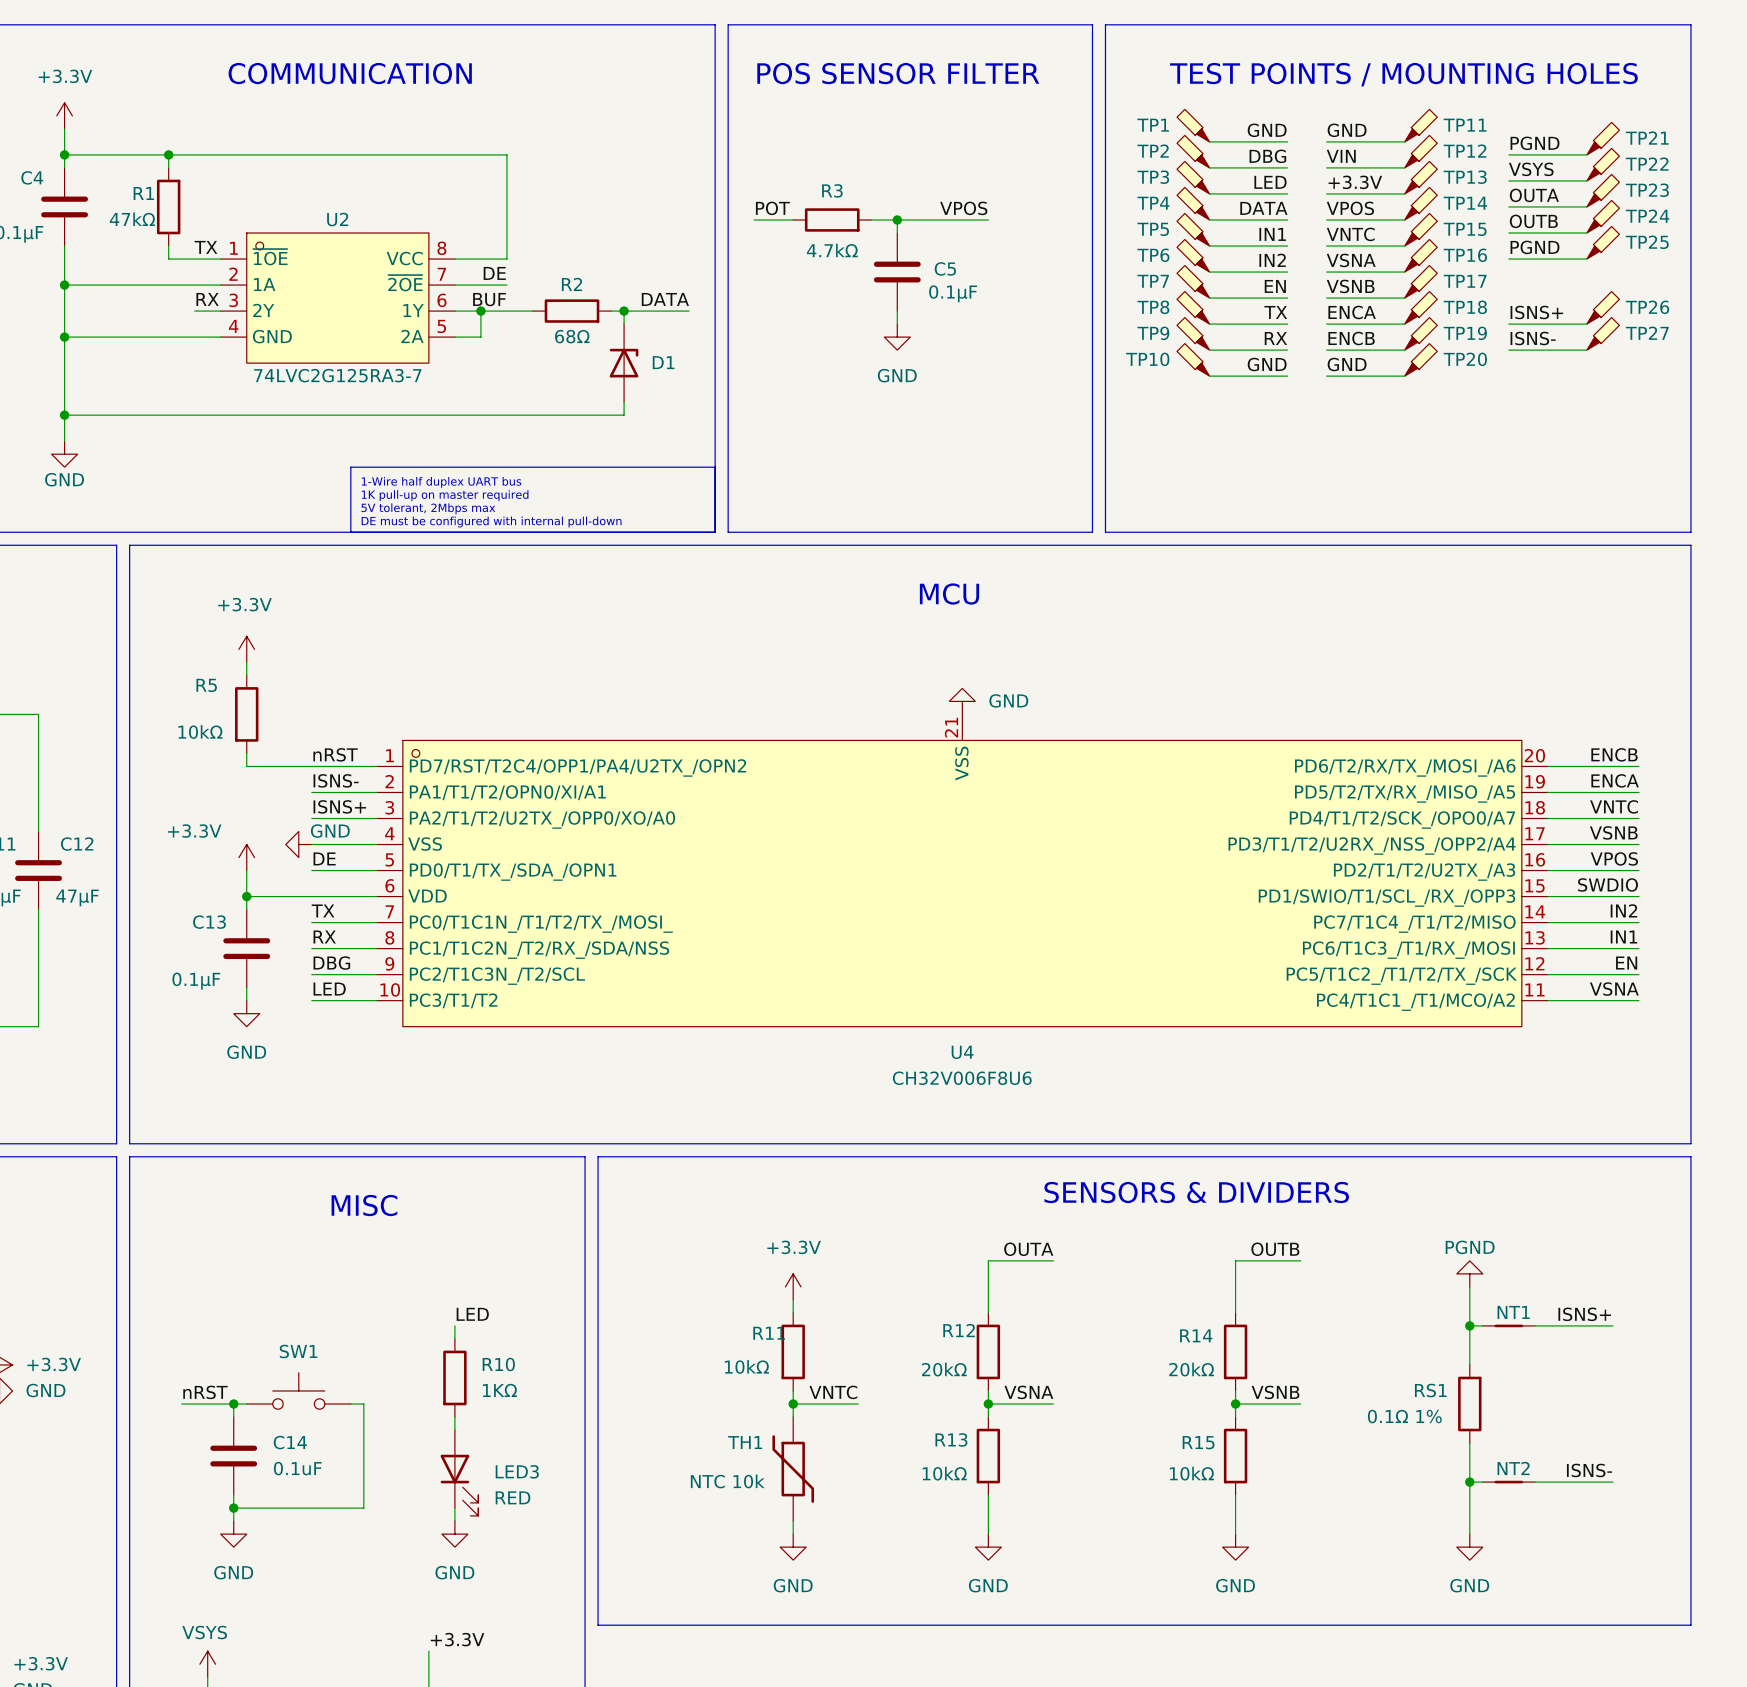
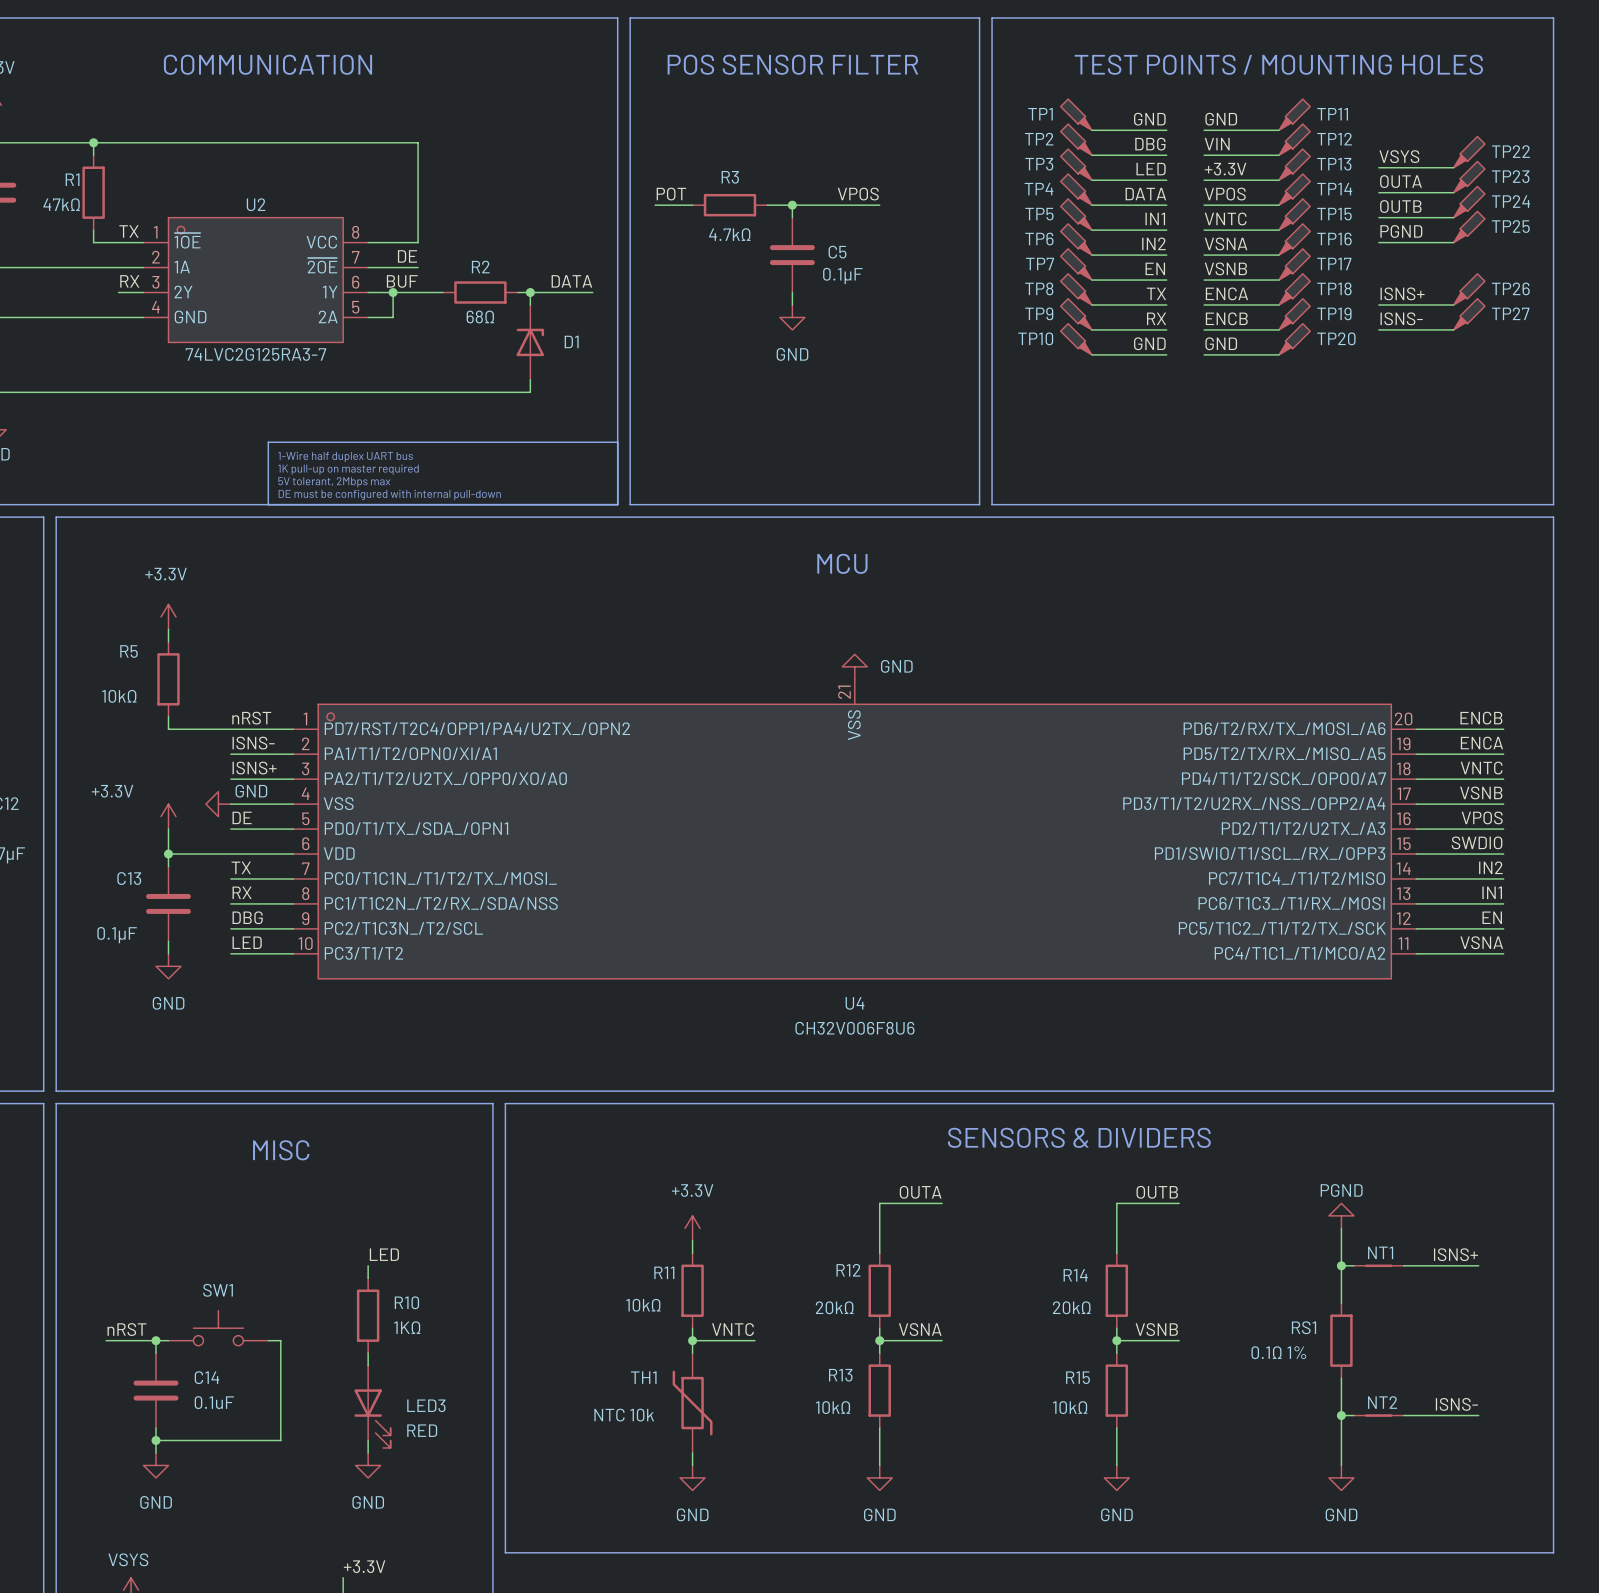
TP21: (1603, 138) -> none
label: PGND (1535, 143) -> none
wire: (1508, 154) (1586, 154) -> none

